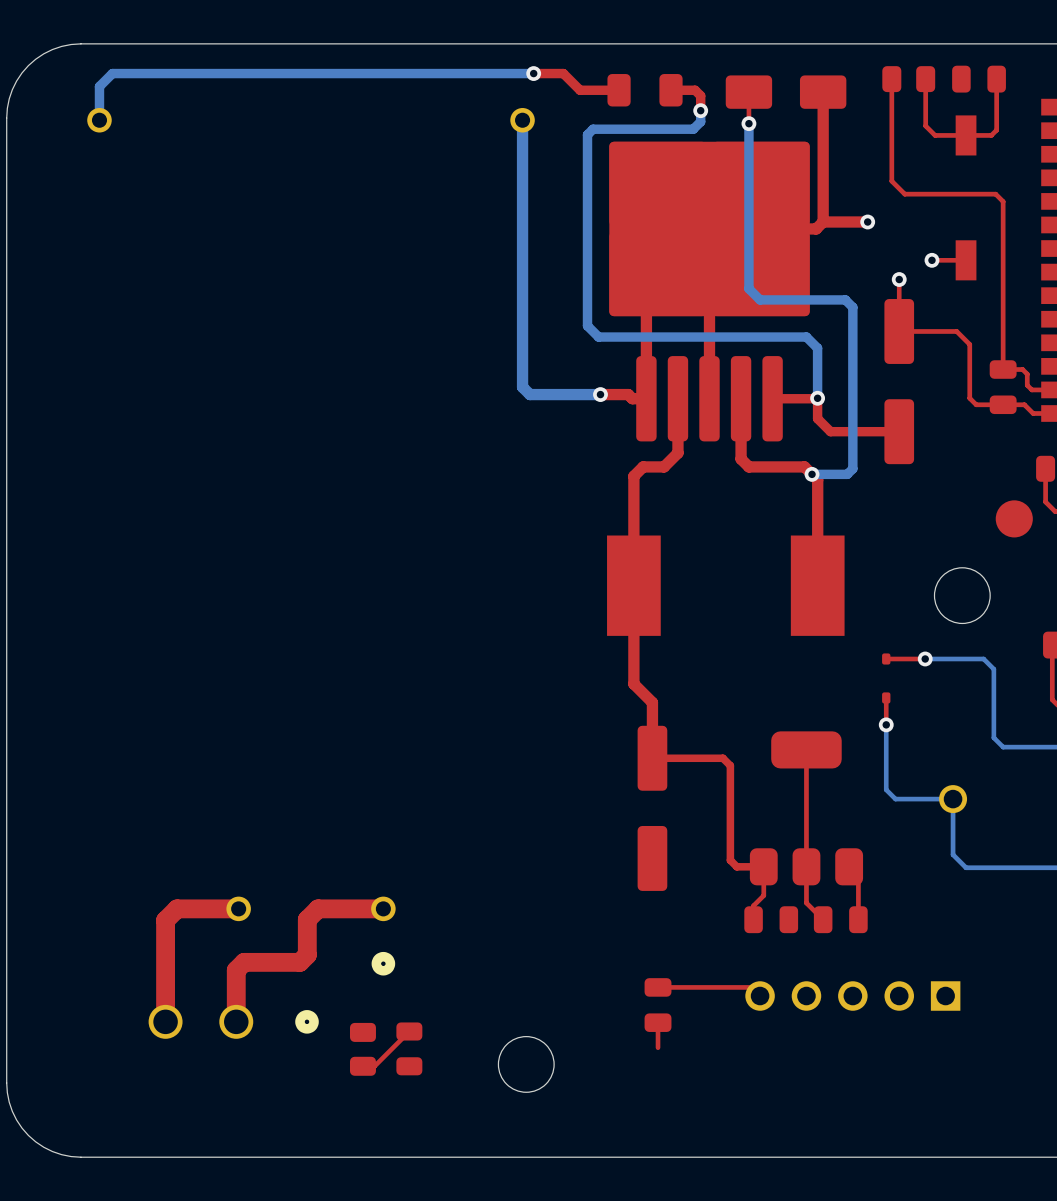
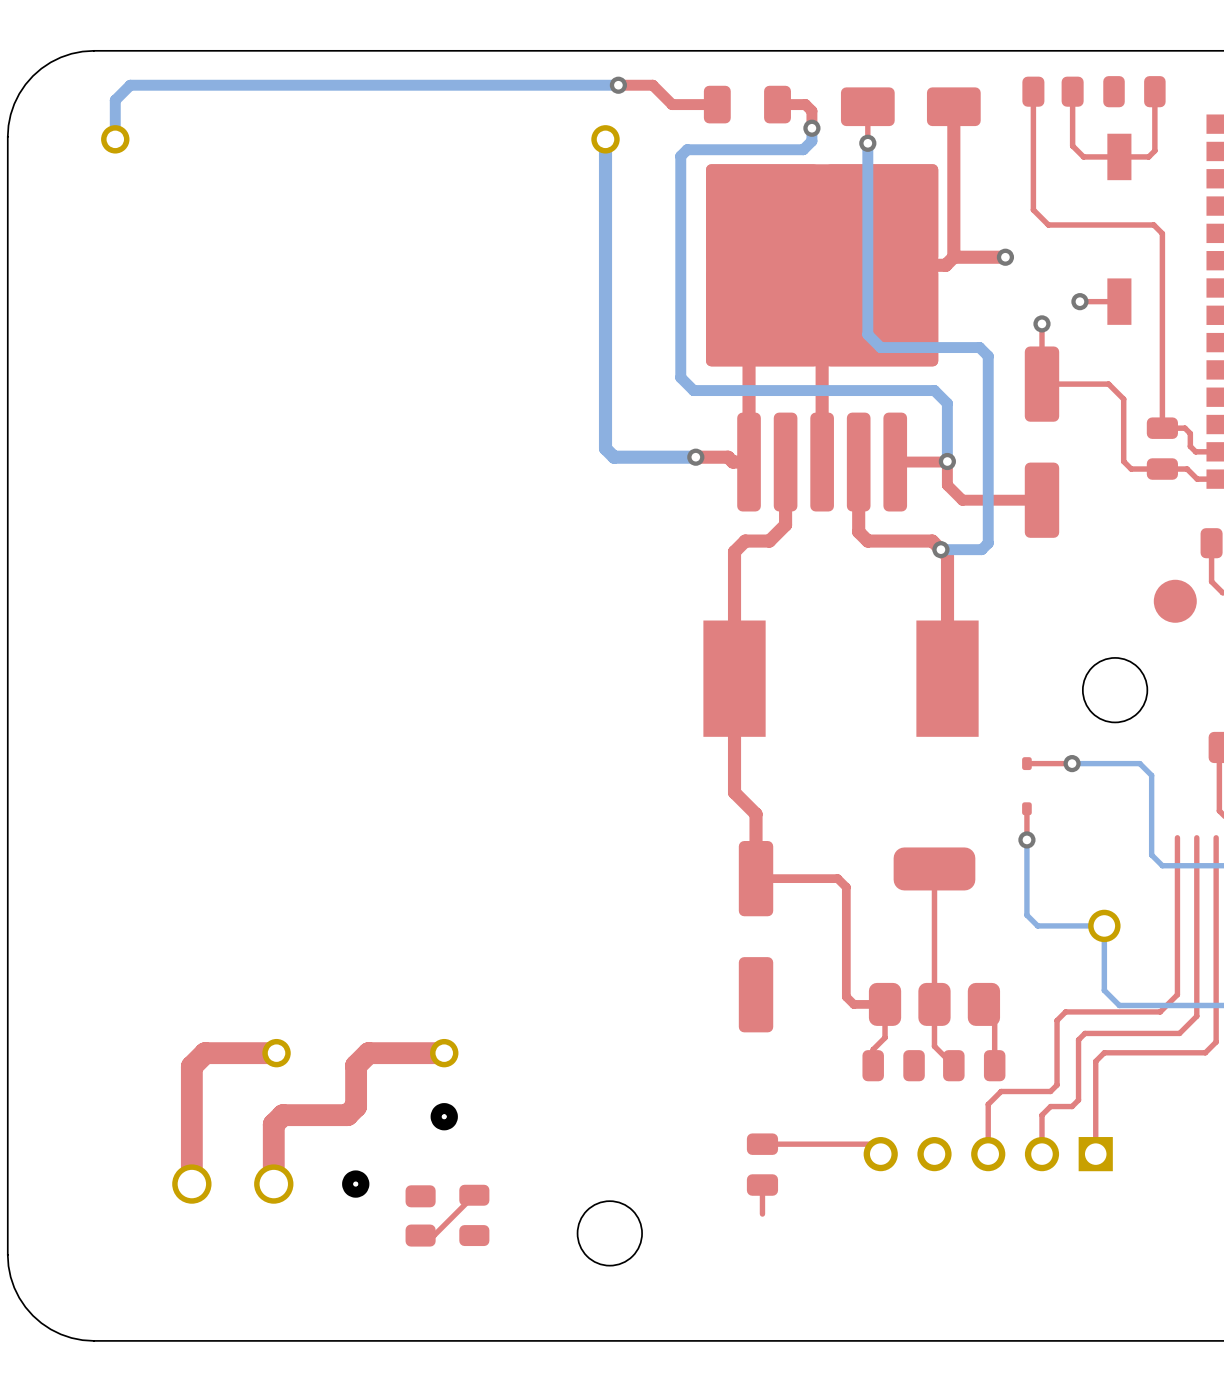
top track: none -> (1177, 837) (1177, 994) (1160, 1011) (1065, 1011) (1057, 1020) (1057, 1085) (1050, 1091) (1001, 1091) (988, 1104) (988, 1154)
top track: none -> (1196, 837) (1196, 1016) (1179, 1033) (1084, 1033) (1078, 1039) (1078, 1100) (1072, 1106) (1050, 1106) (1041, 1115) (1041, 1154)
top track: none -> (1216, 837) (1216, 1042) (1205, 1052) (1104, 1052) (1095, 1061) (1095, 1154)

